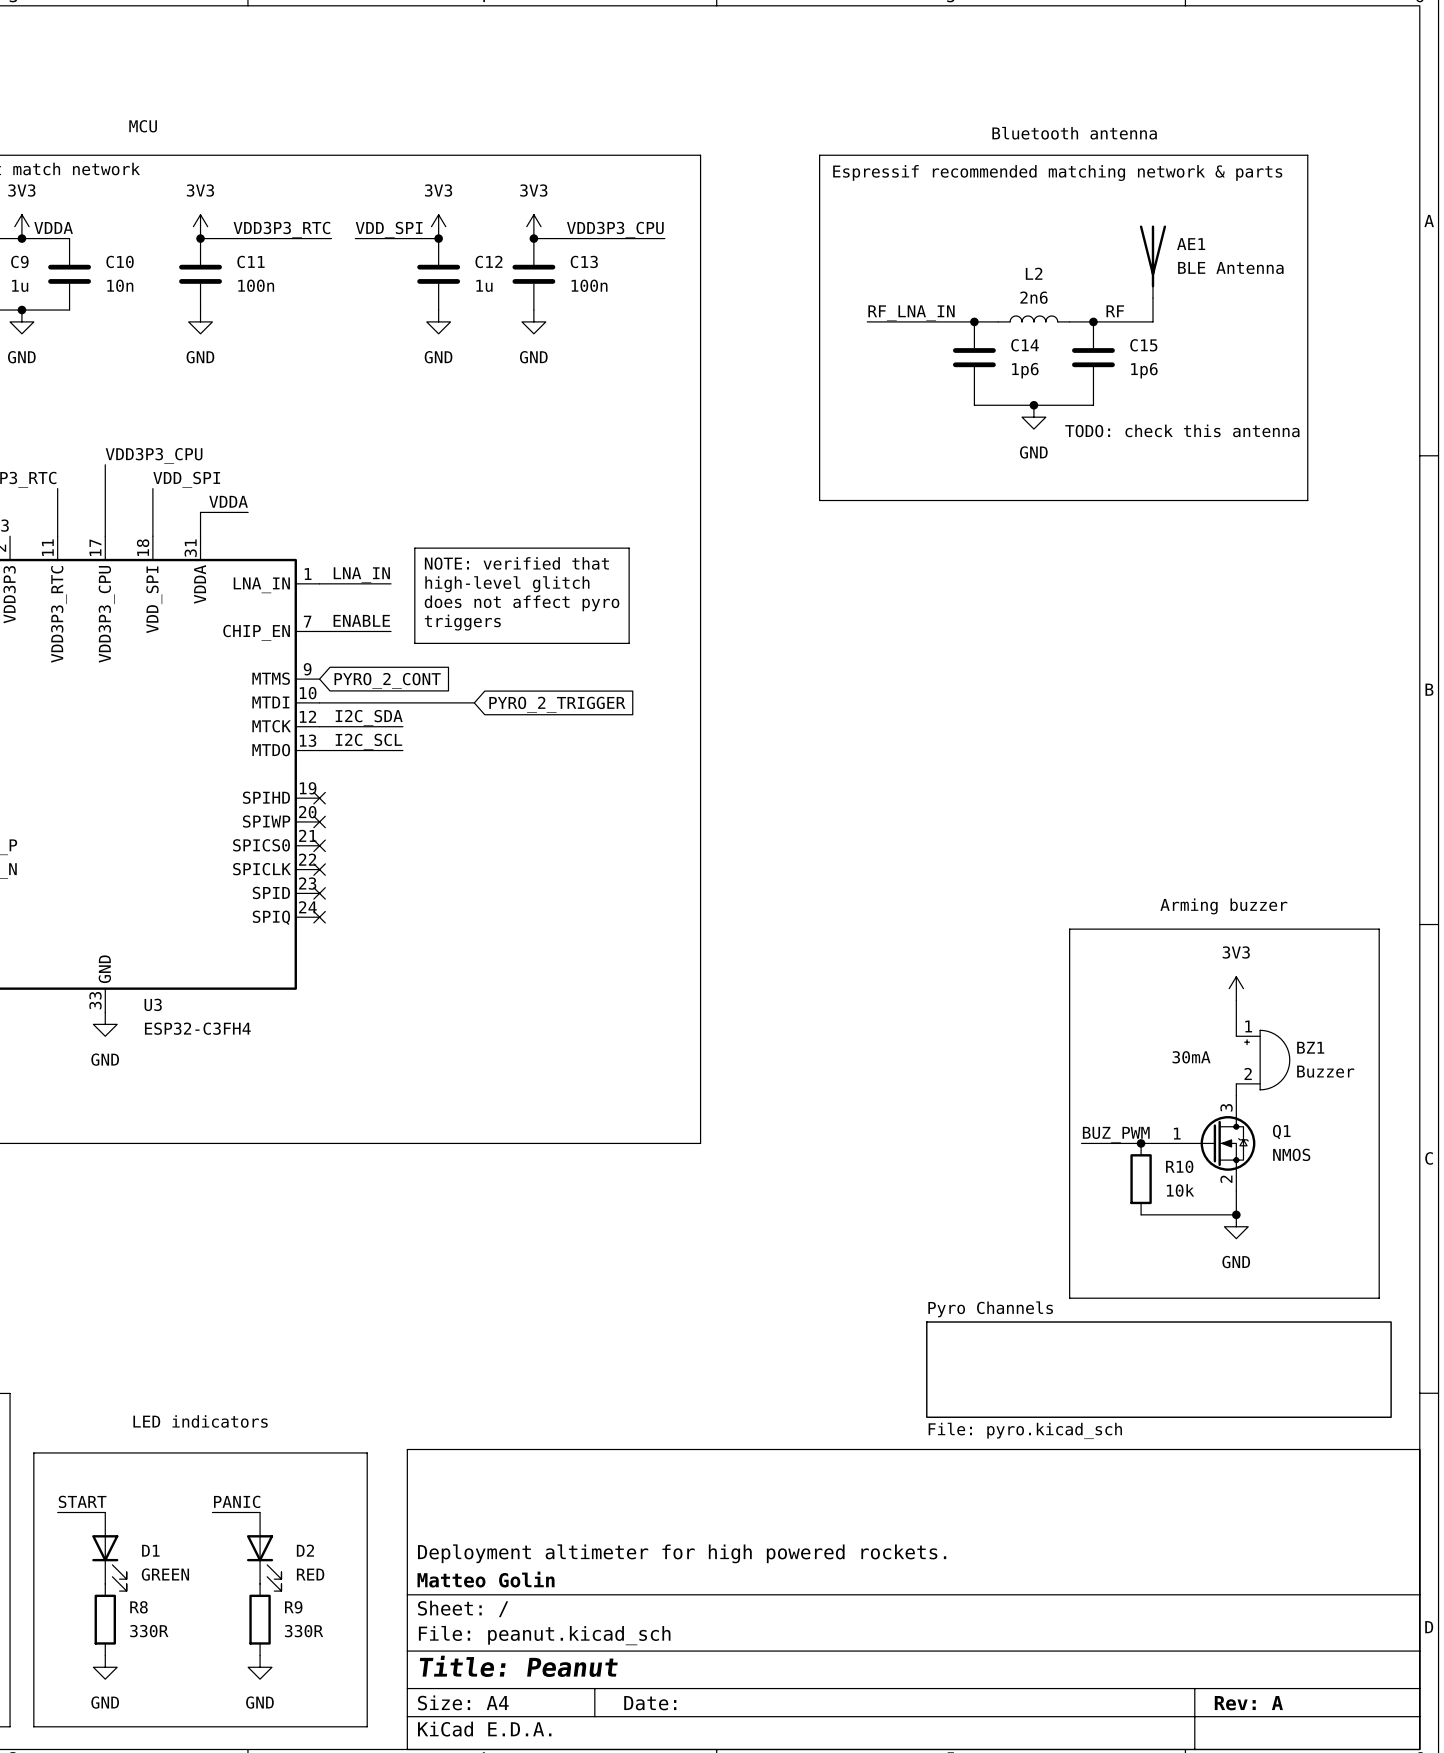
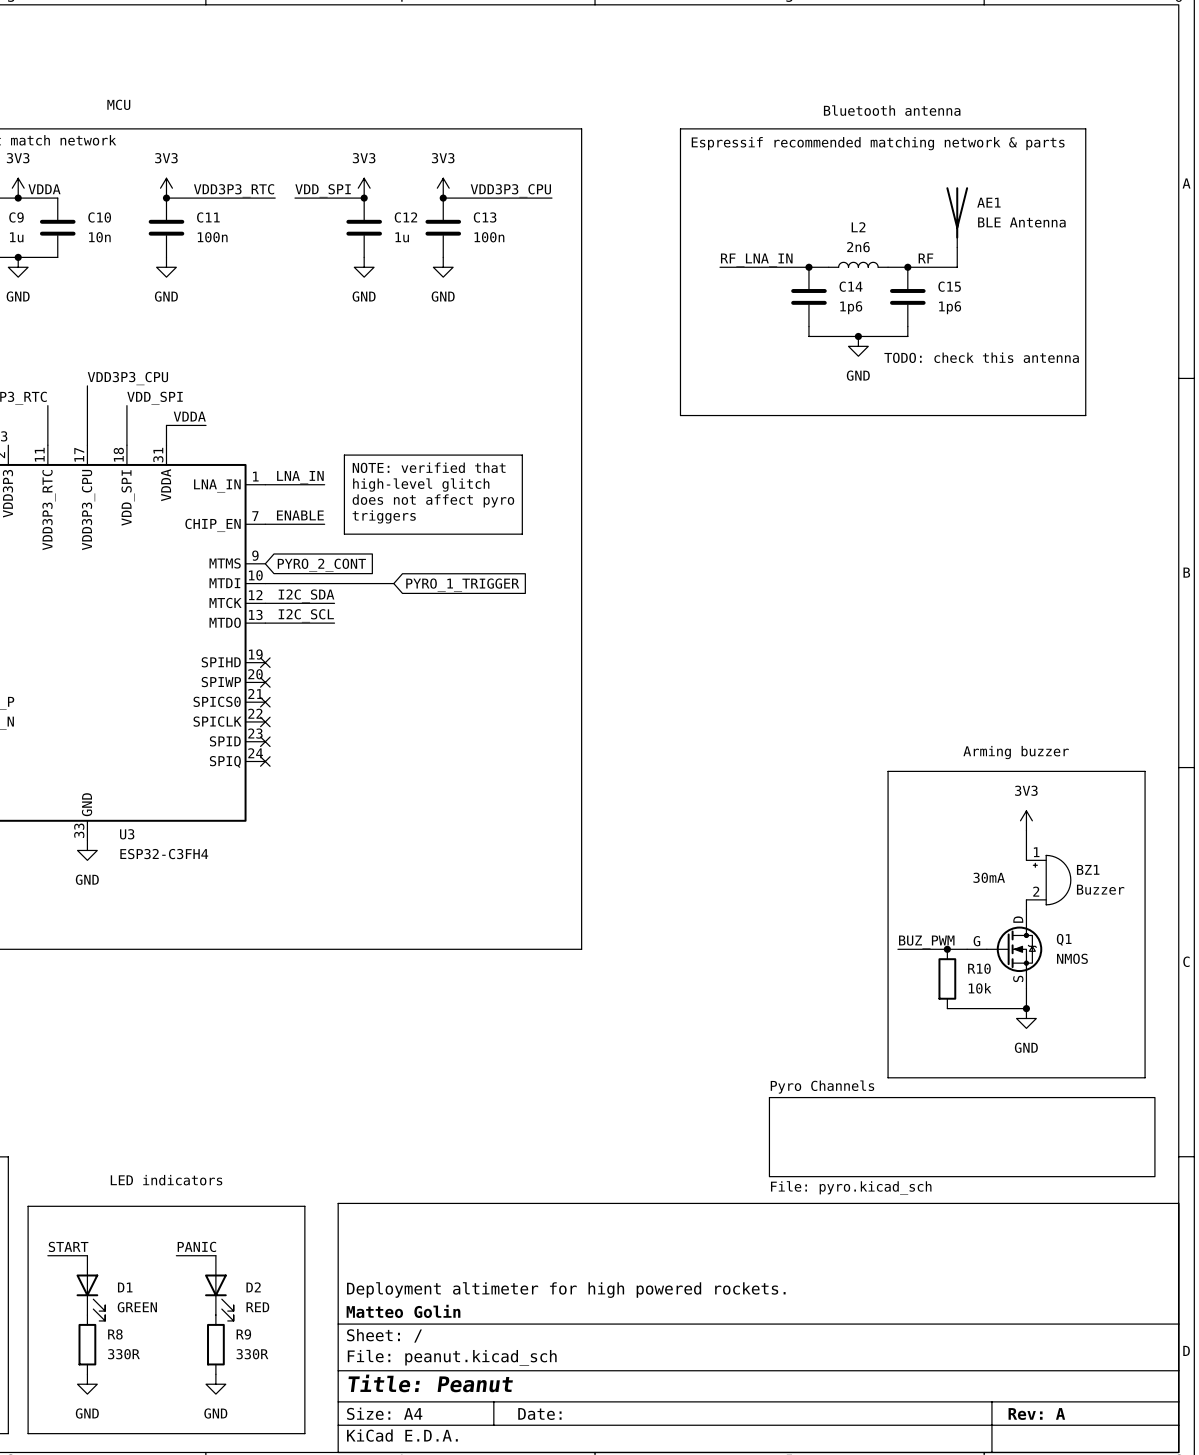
global label: PYRO_2_TRIGGER (557, 704) -> PYRO_1_TRIGGER (462, 585)
Q1 symbol: [1164, 1095, 1256, 1192] -> [967, 909, 1043, 989]

